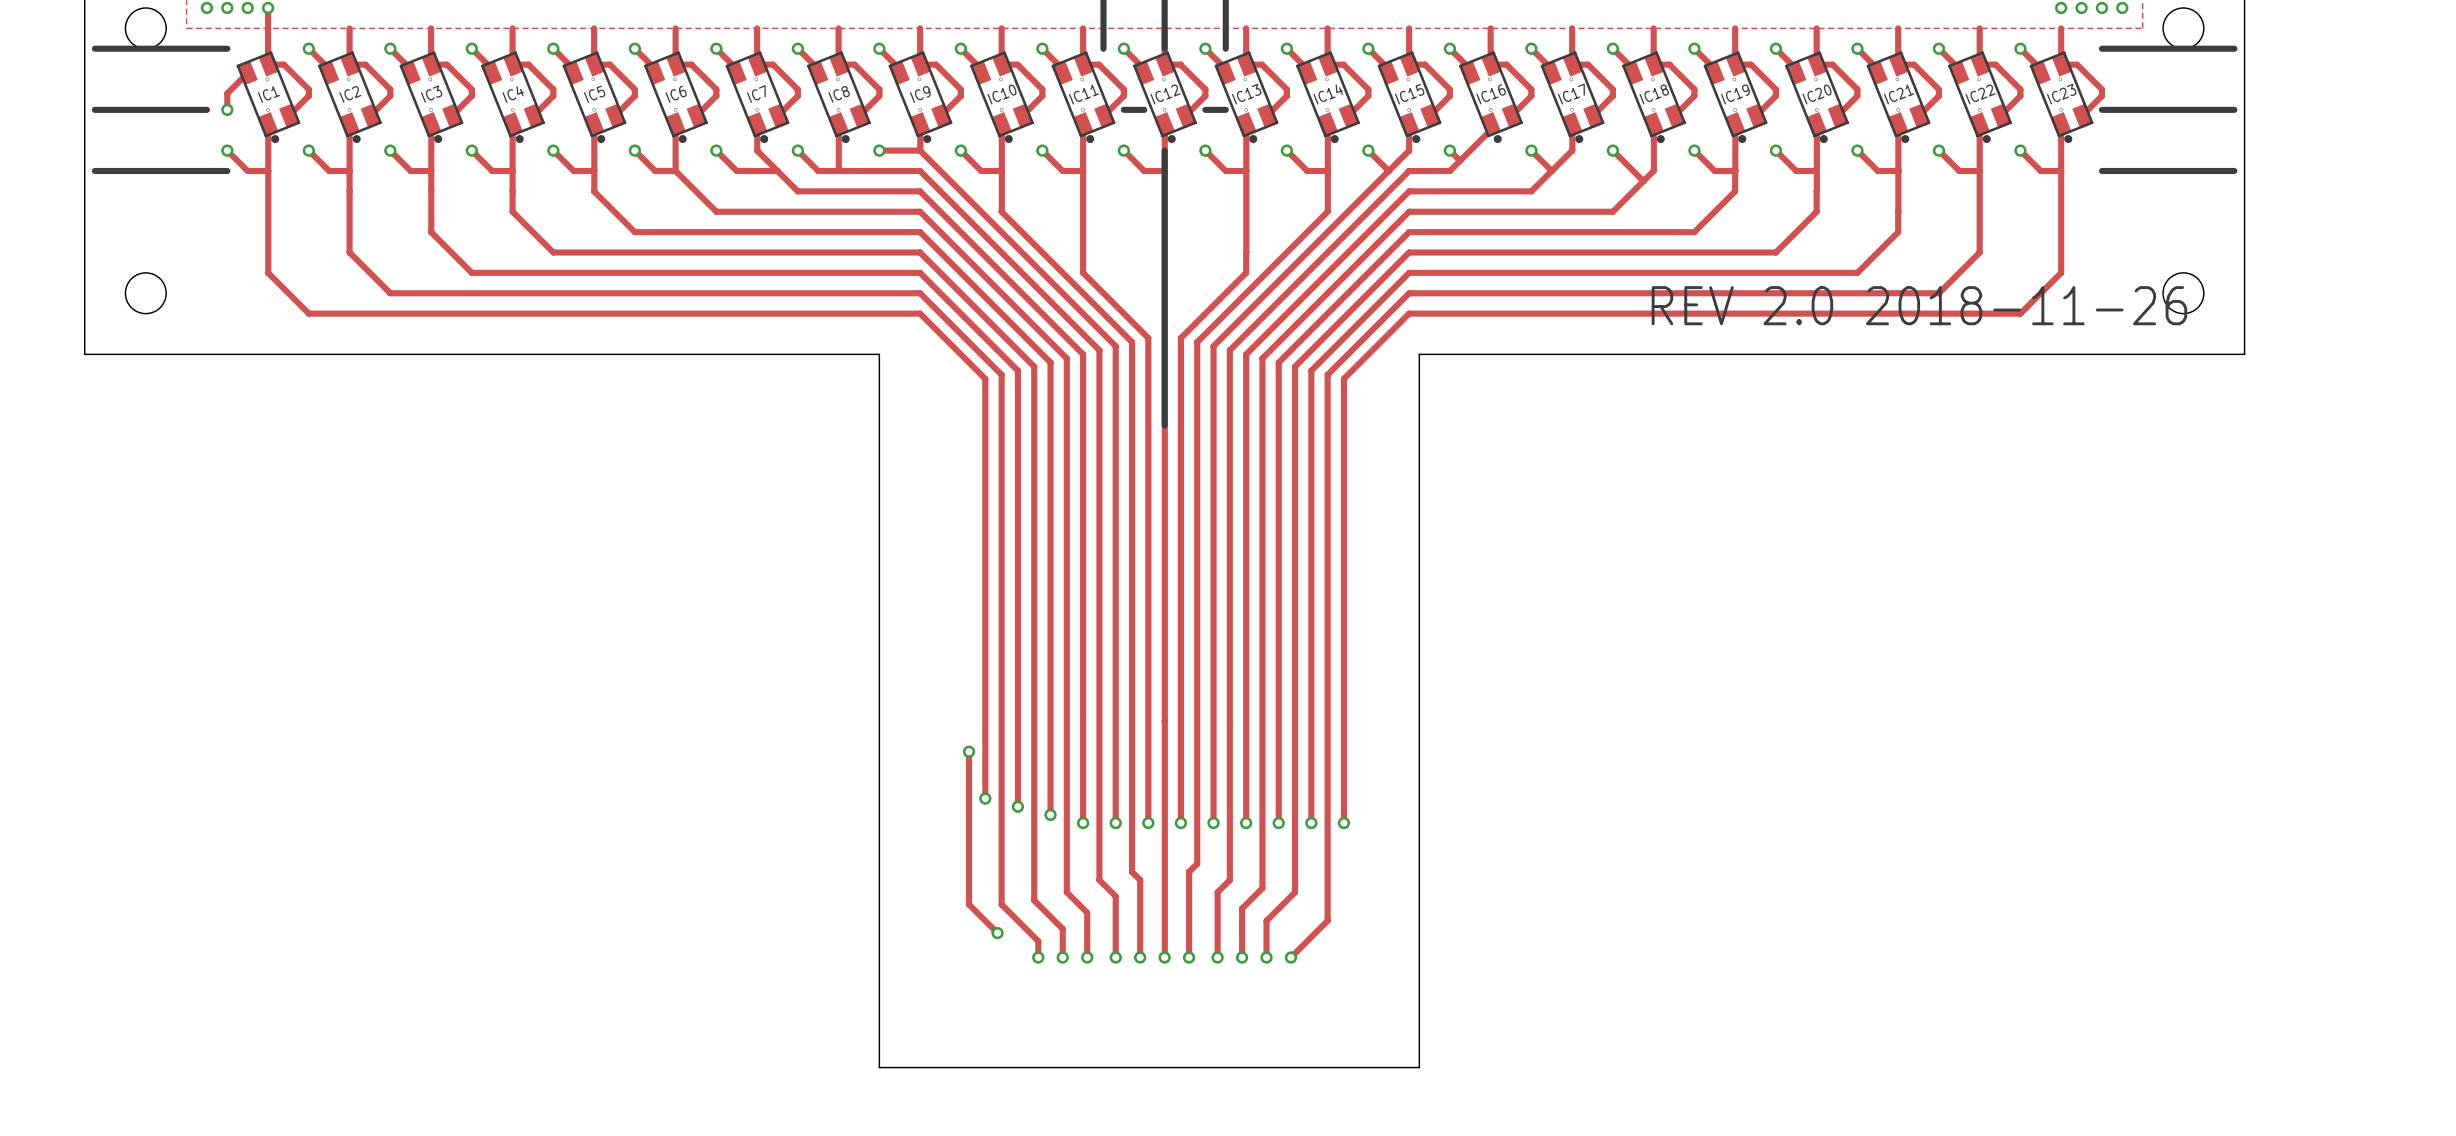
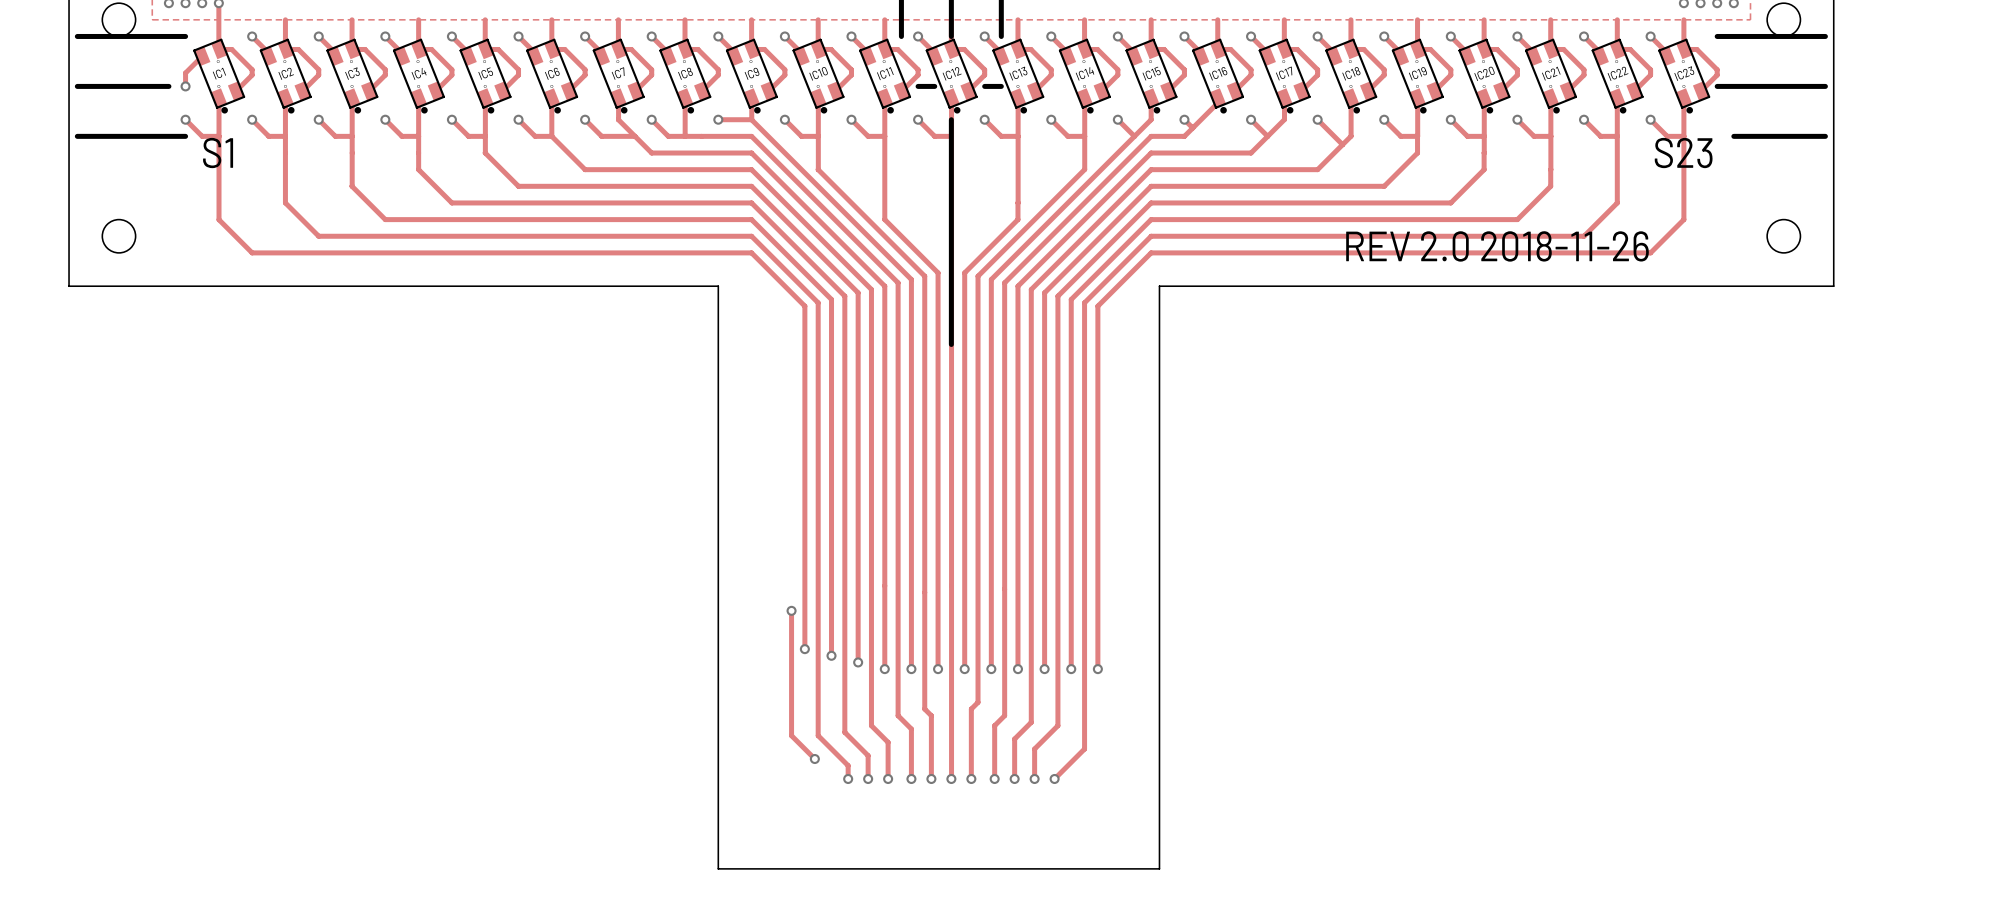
line: (2101, 170) (2122, 170) -> none
text: none -> S1 (218, 153)
text: none -> S23 (1683, 153)

